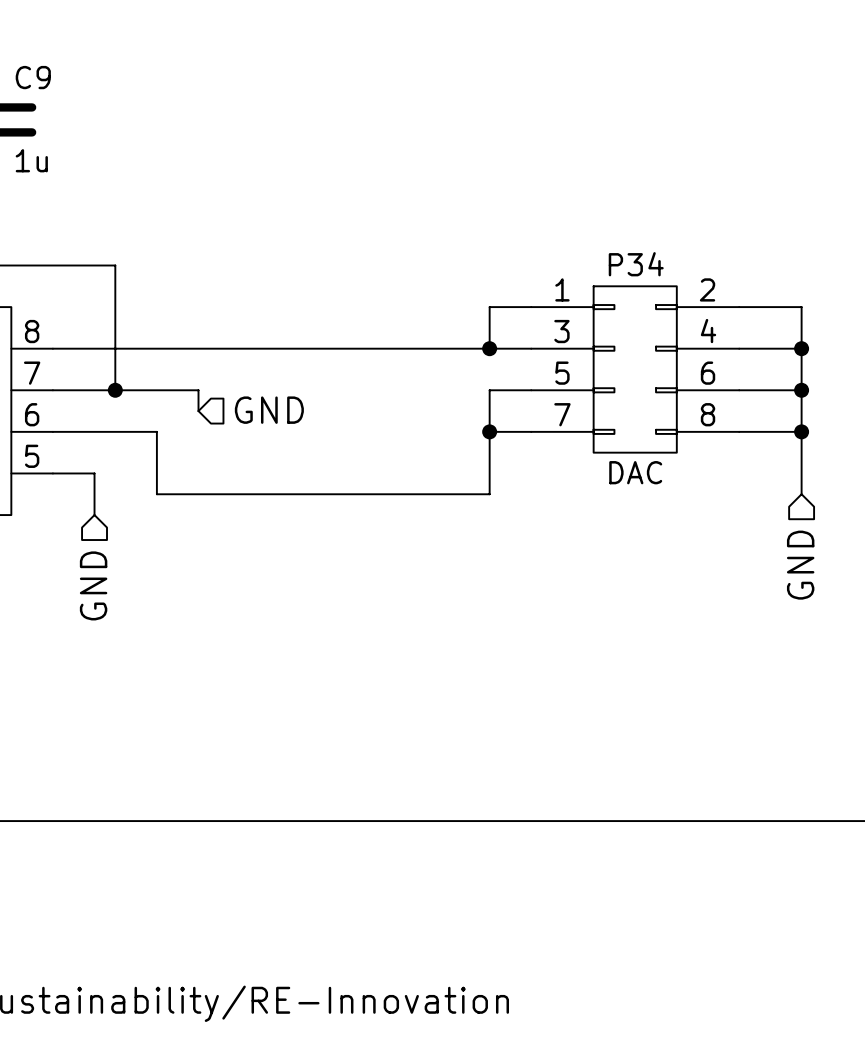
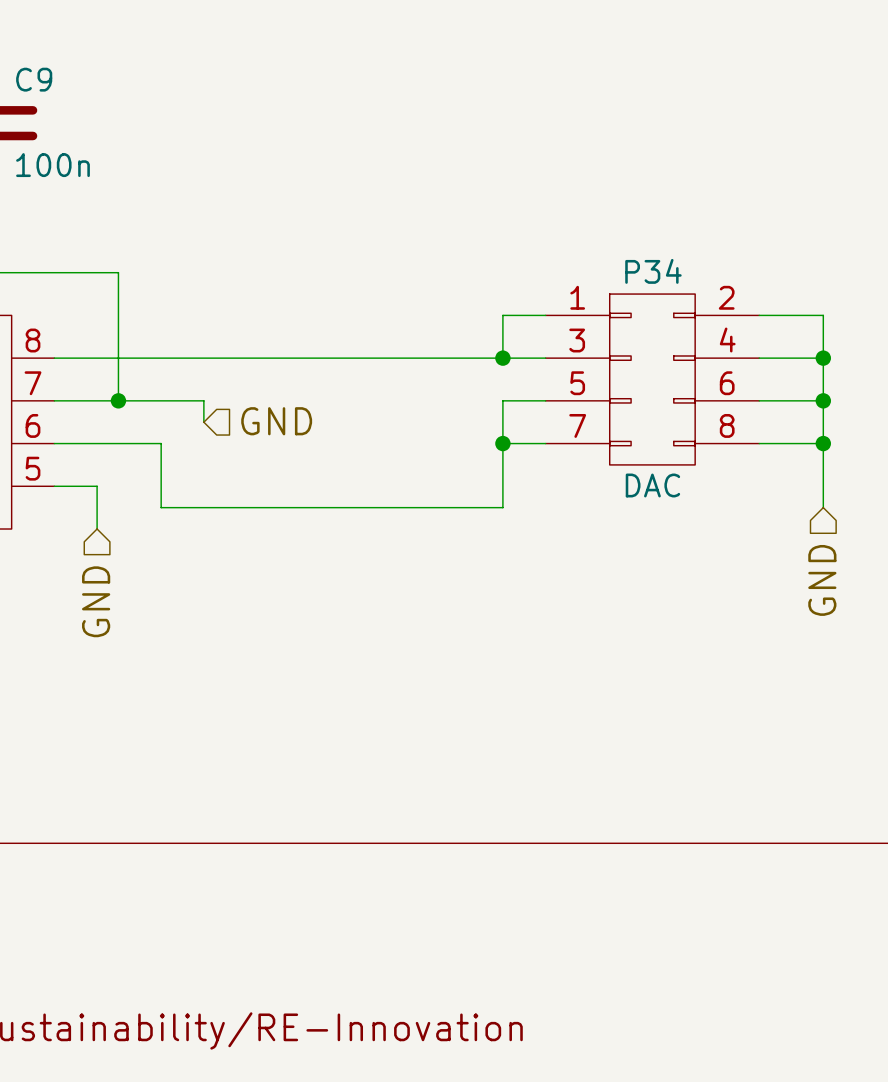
C9 value: 1u (31, 160) -> 100n (53, 165)

